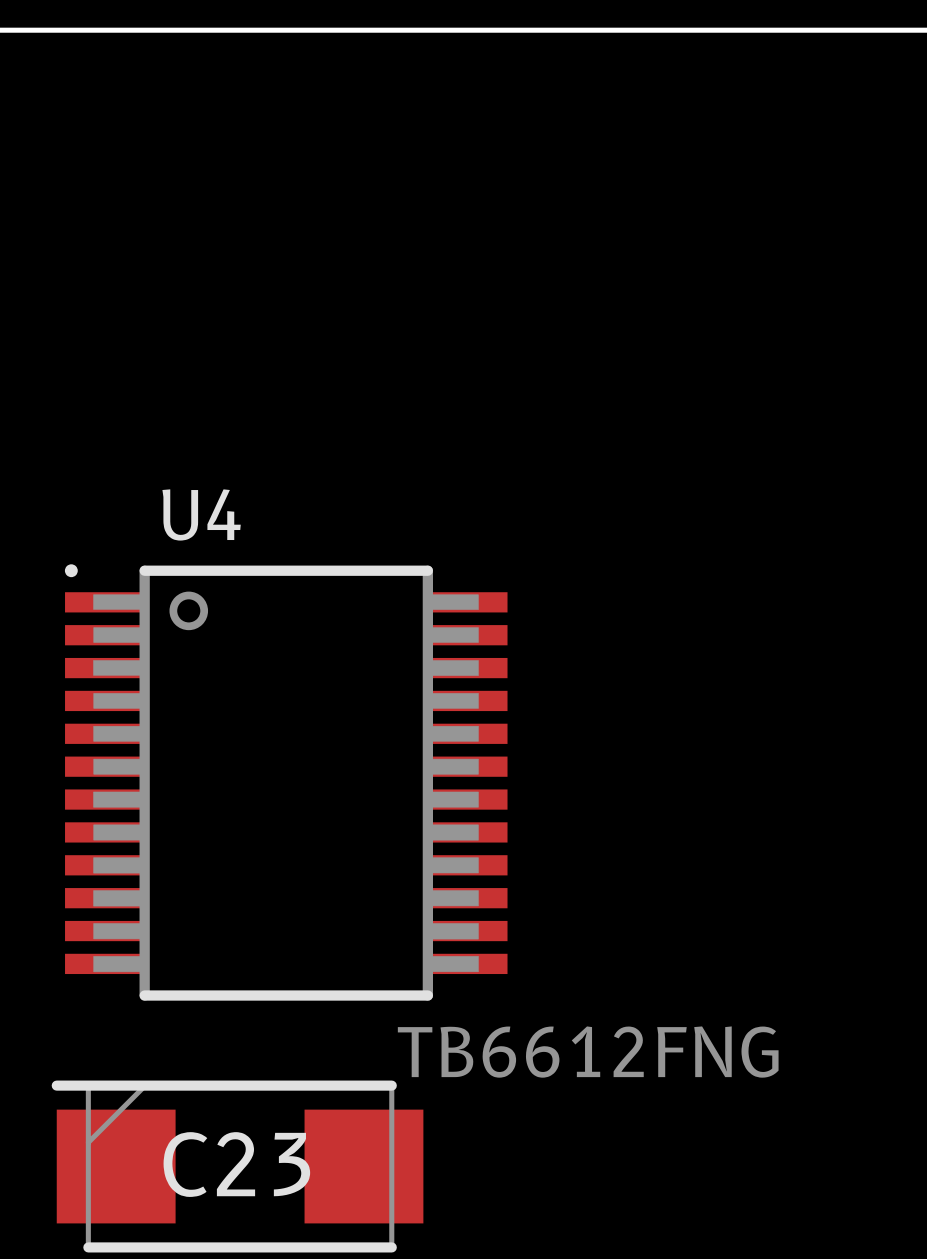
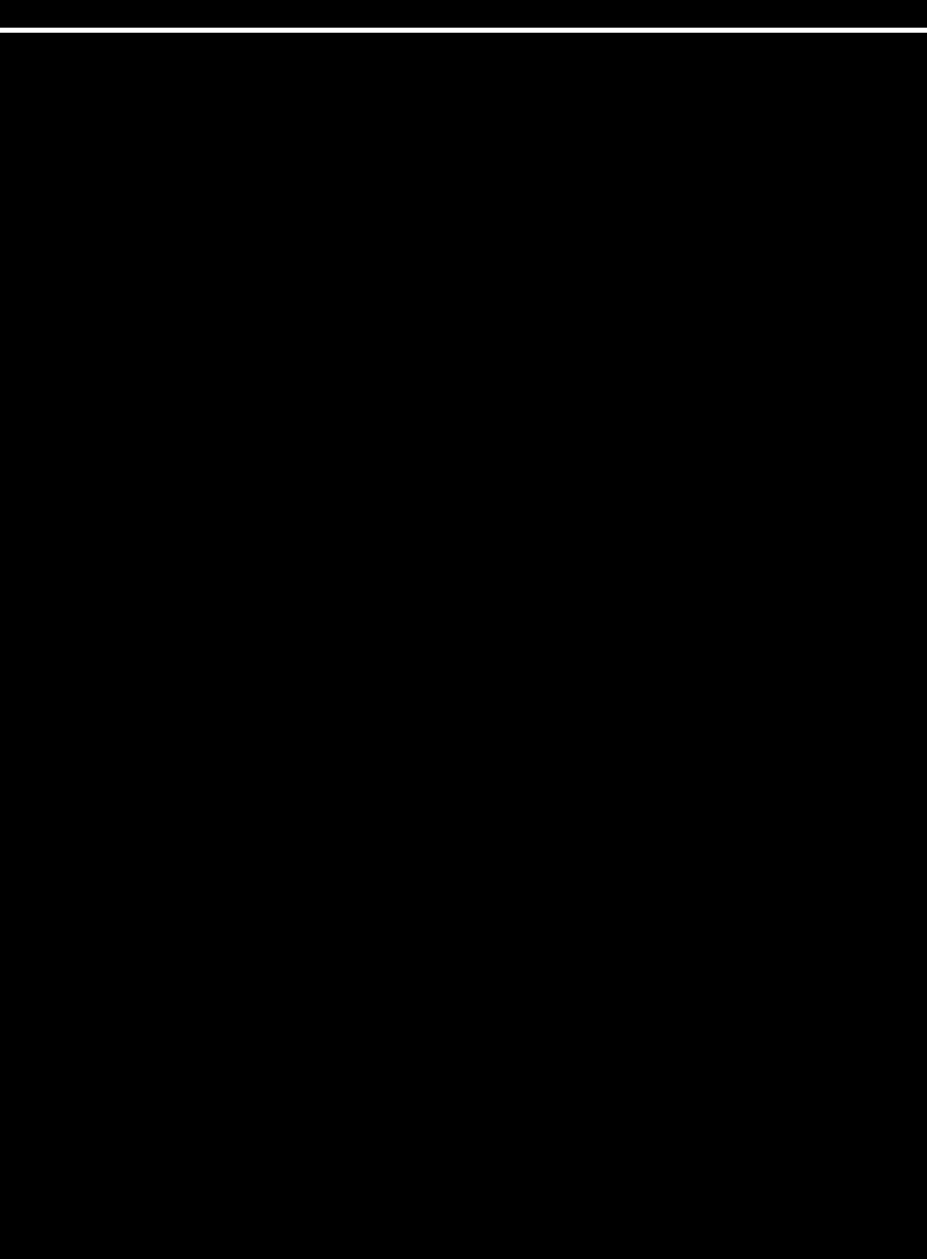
U4: TB6612FNG (286, 782) -> none
C23: (237, 1166) -> none

